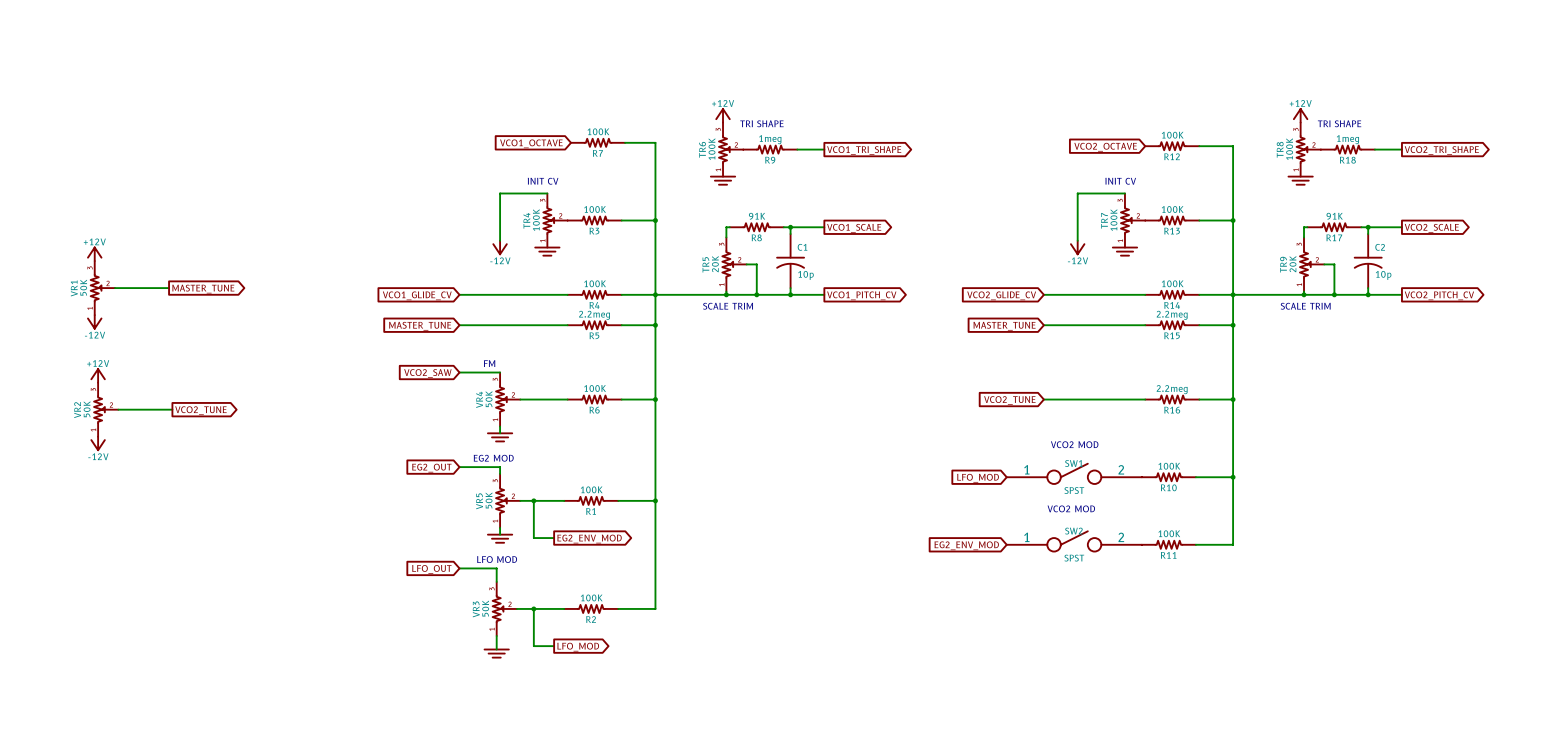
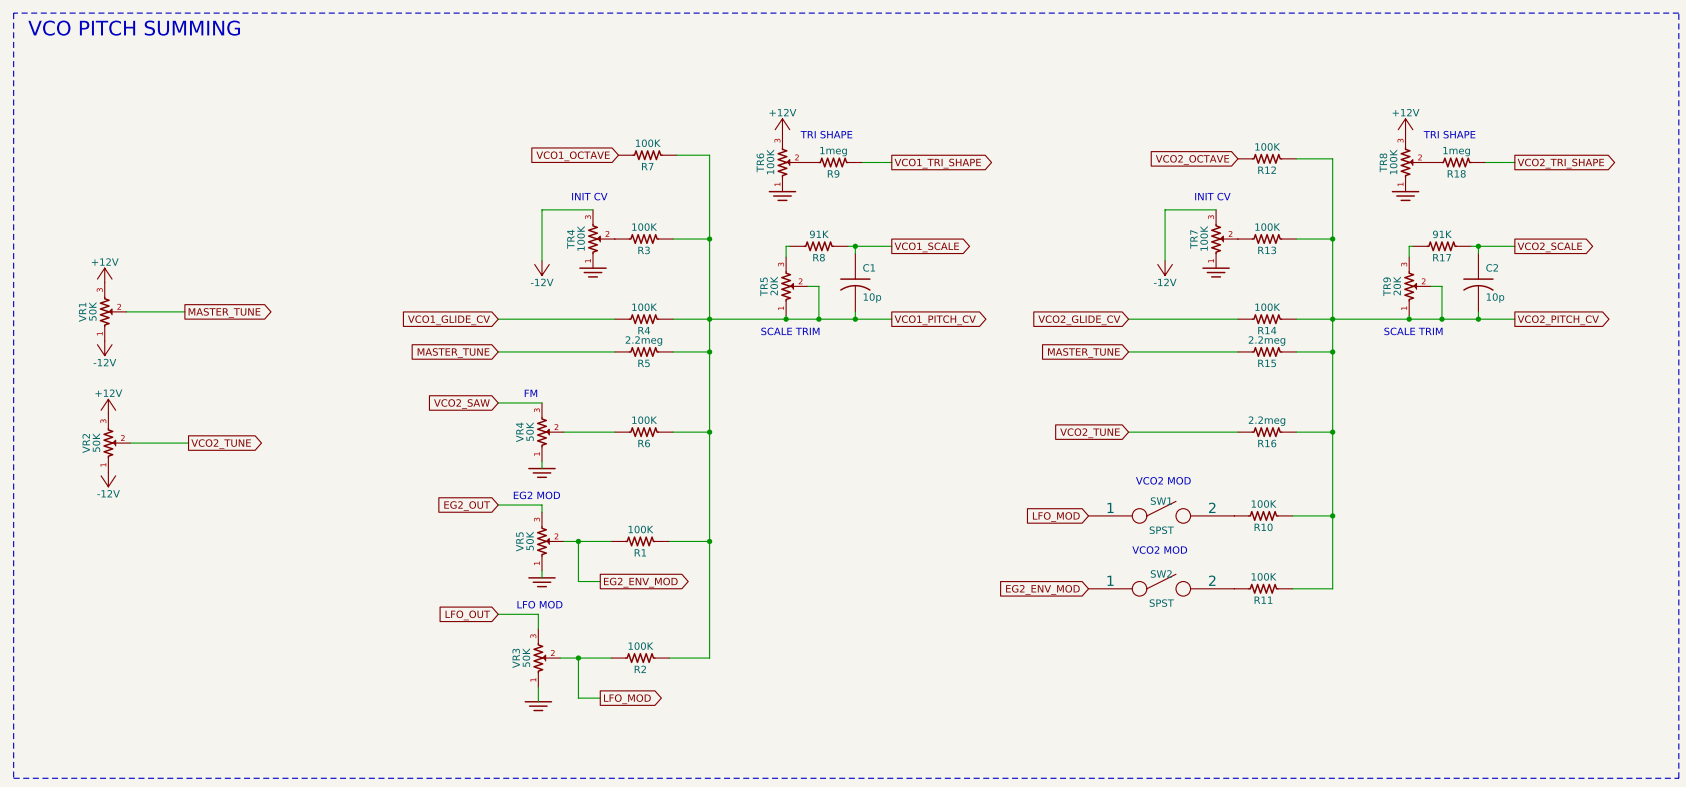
line: none -> (13, 13) (13, 778) (1678, 778) (1678, 13) (13, 13)
text: none -> VCO PITCH SUMMING (134, 28)

